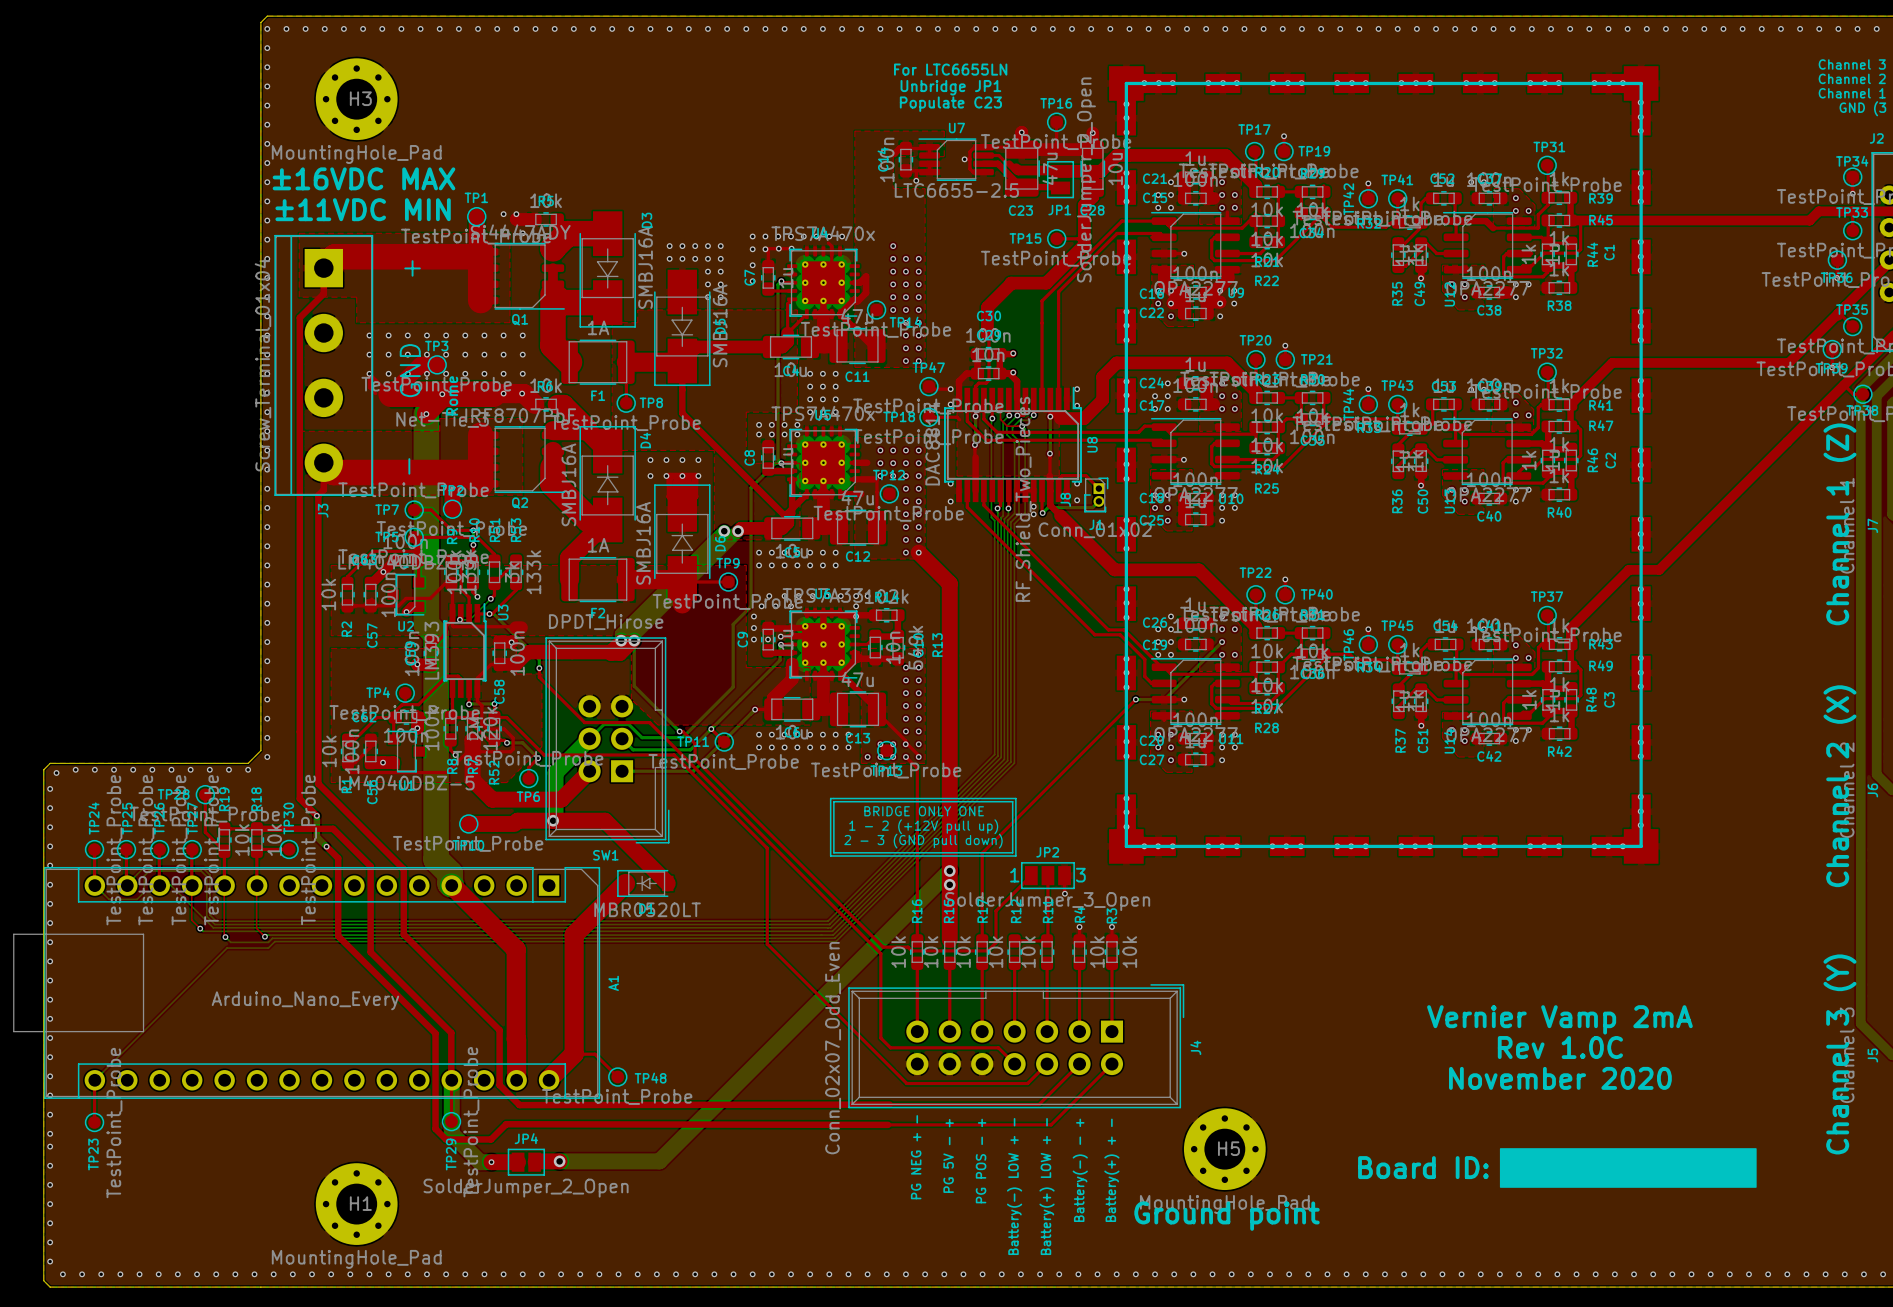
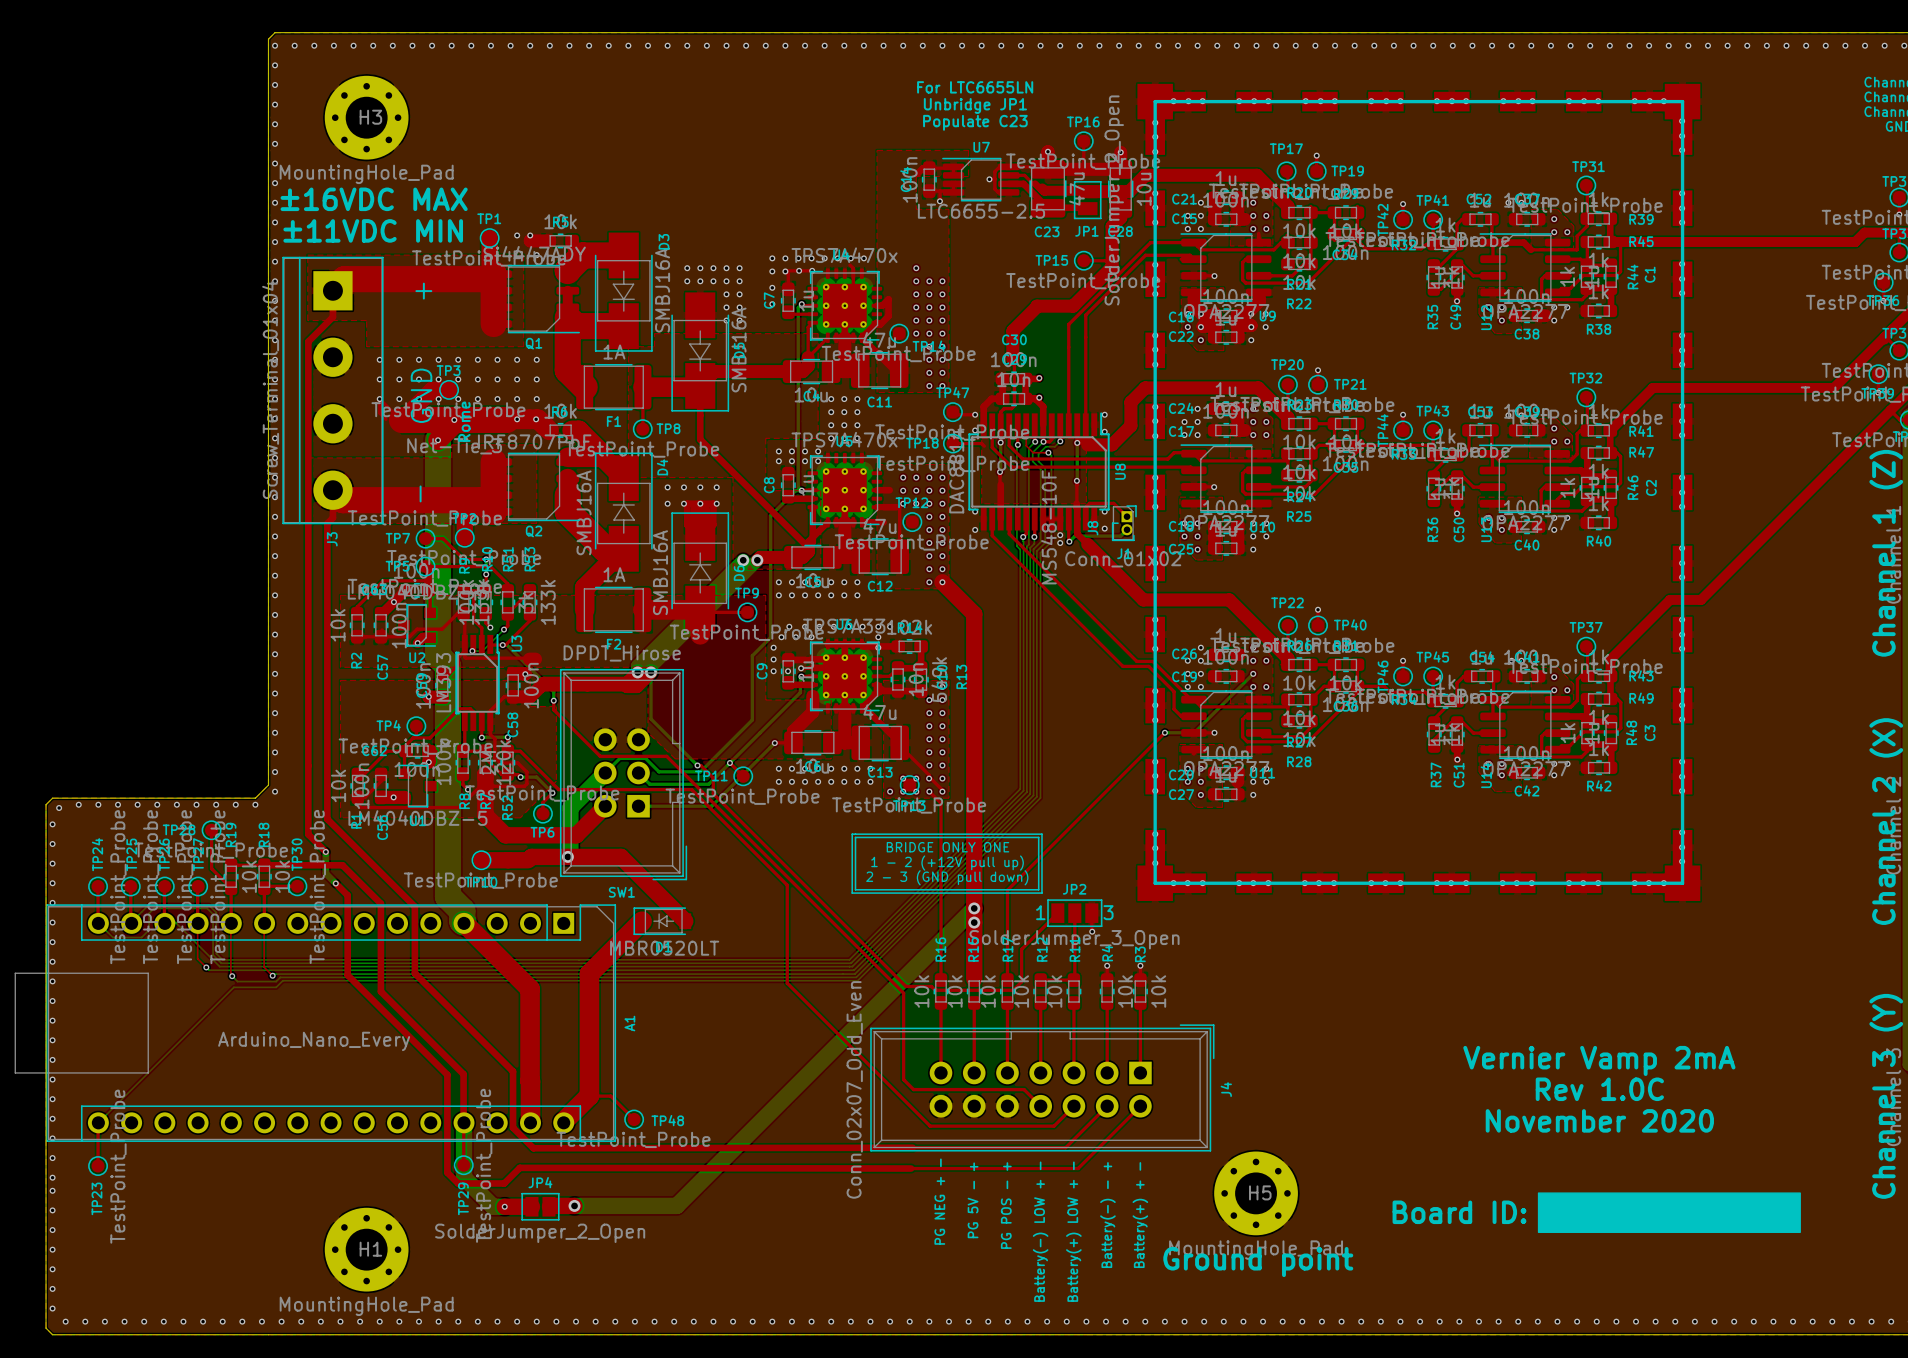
J8 value: RF_Shield_Two_Pieces (1023, 499) -> MS548-10F (1048, 527)

